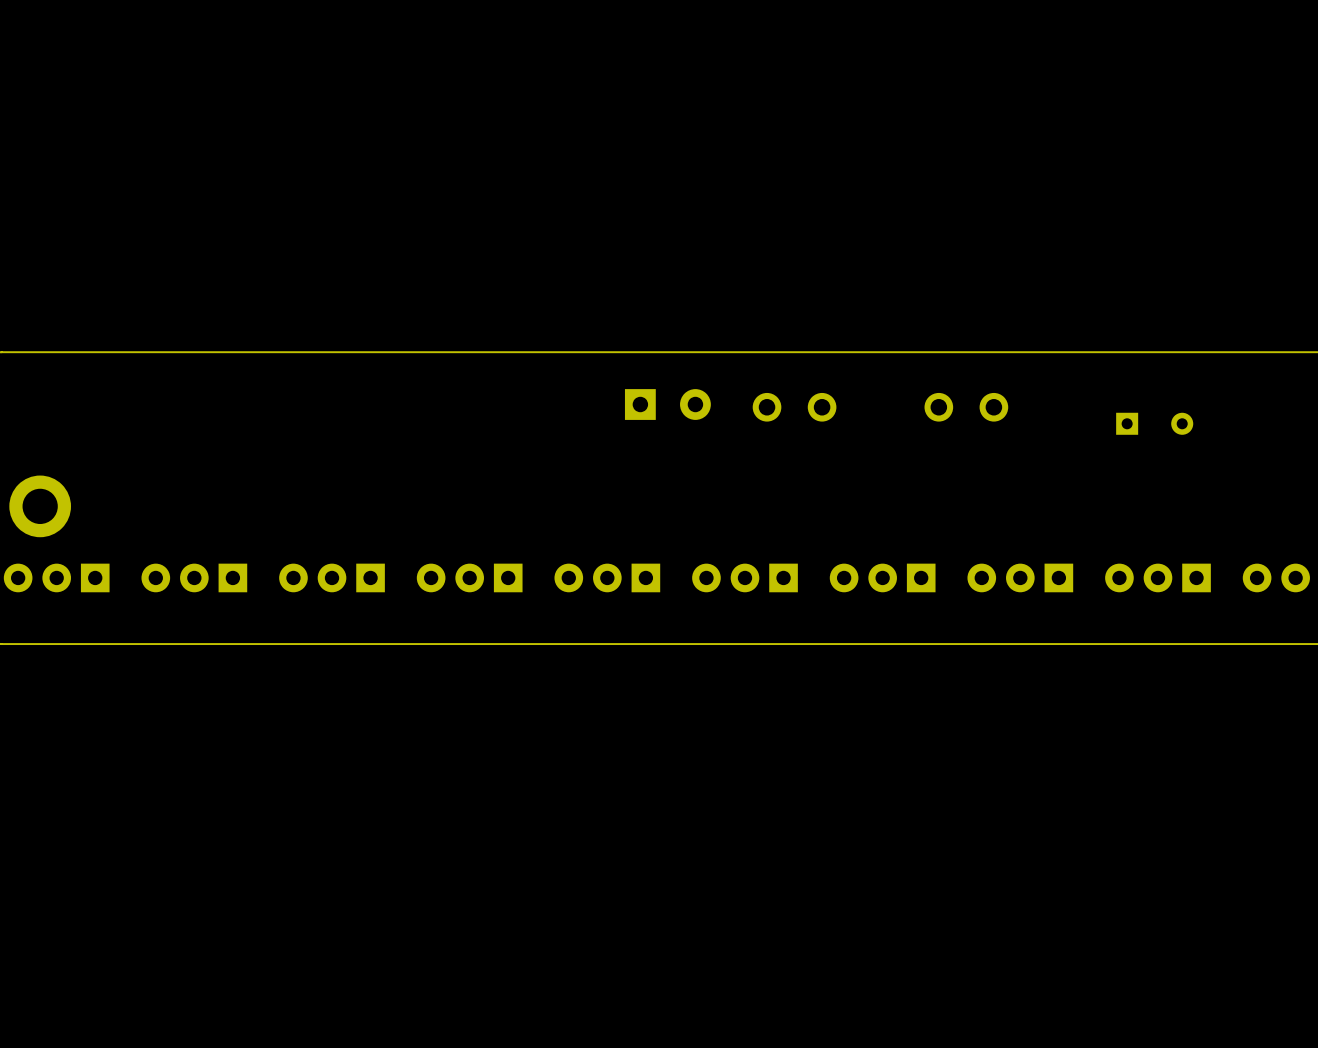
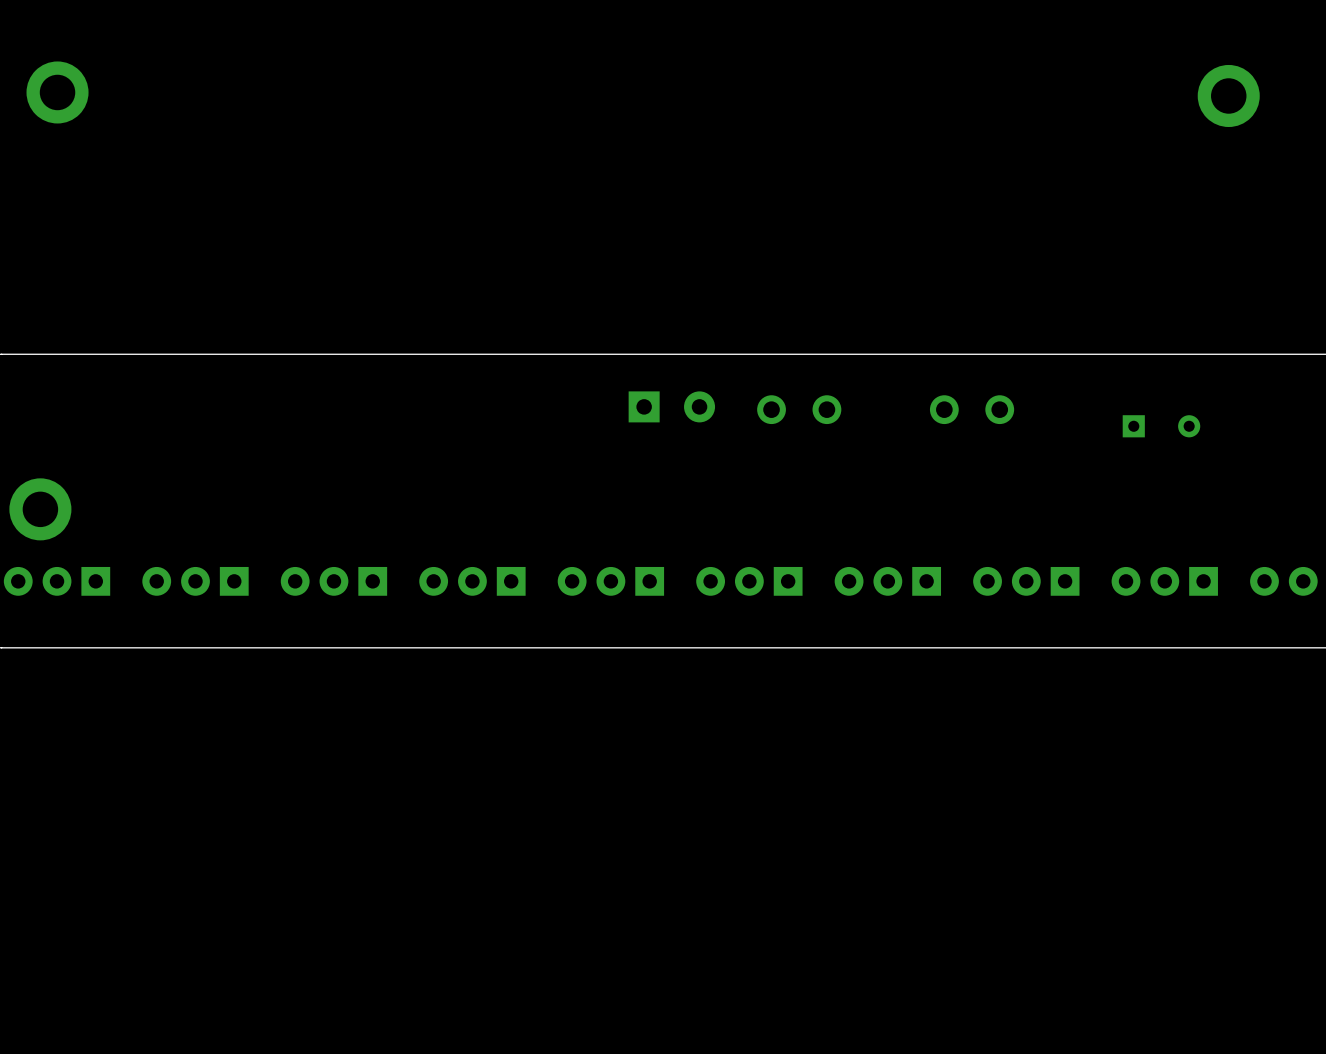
part: none -> (57, 92)
part: none -> (1228, 95)

